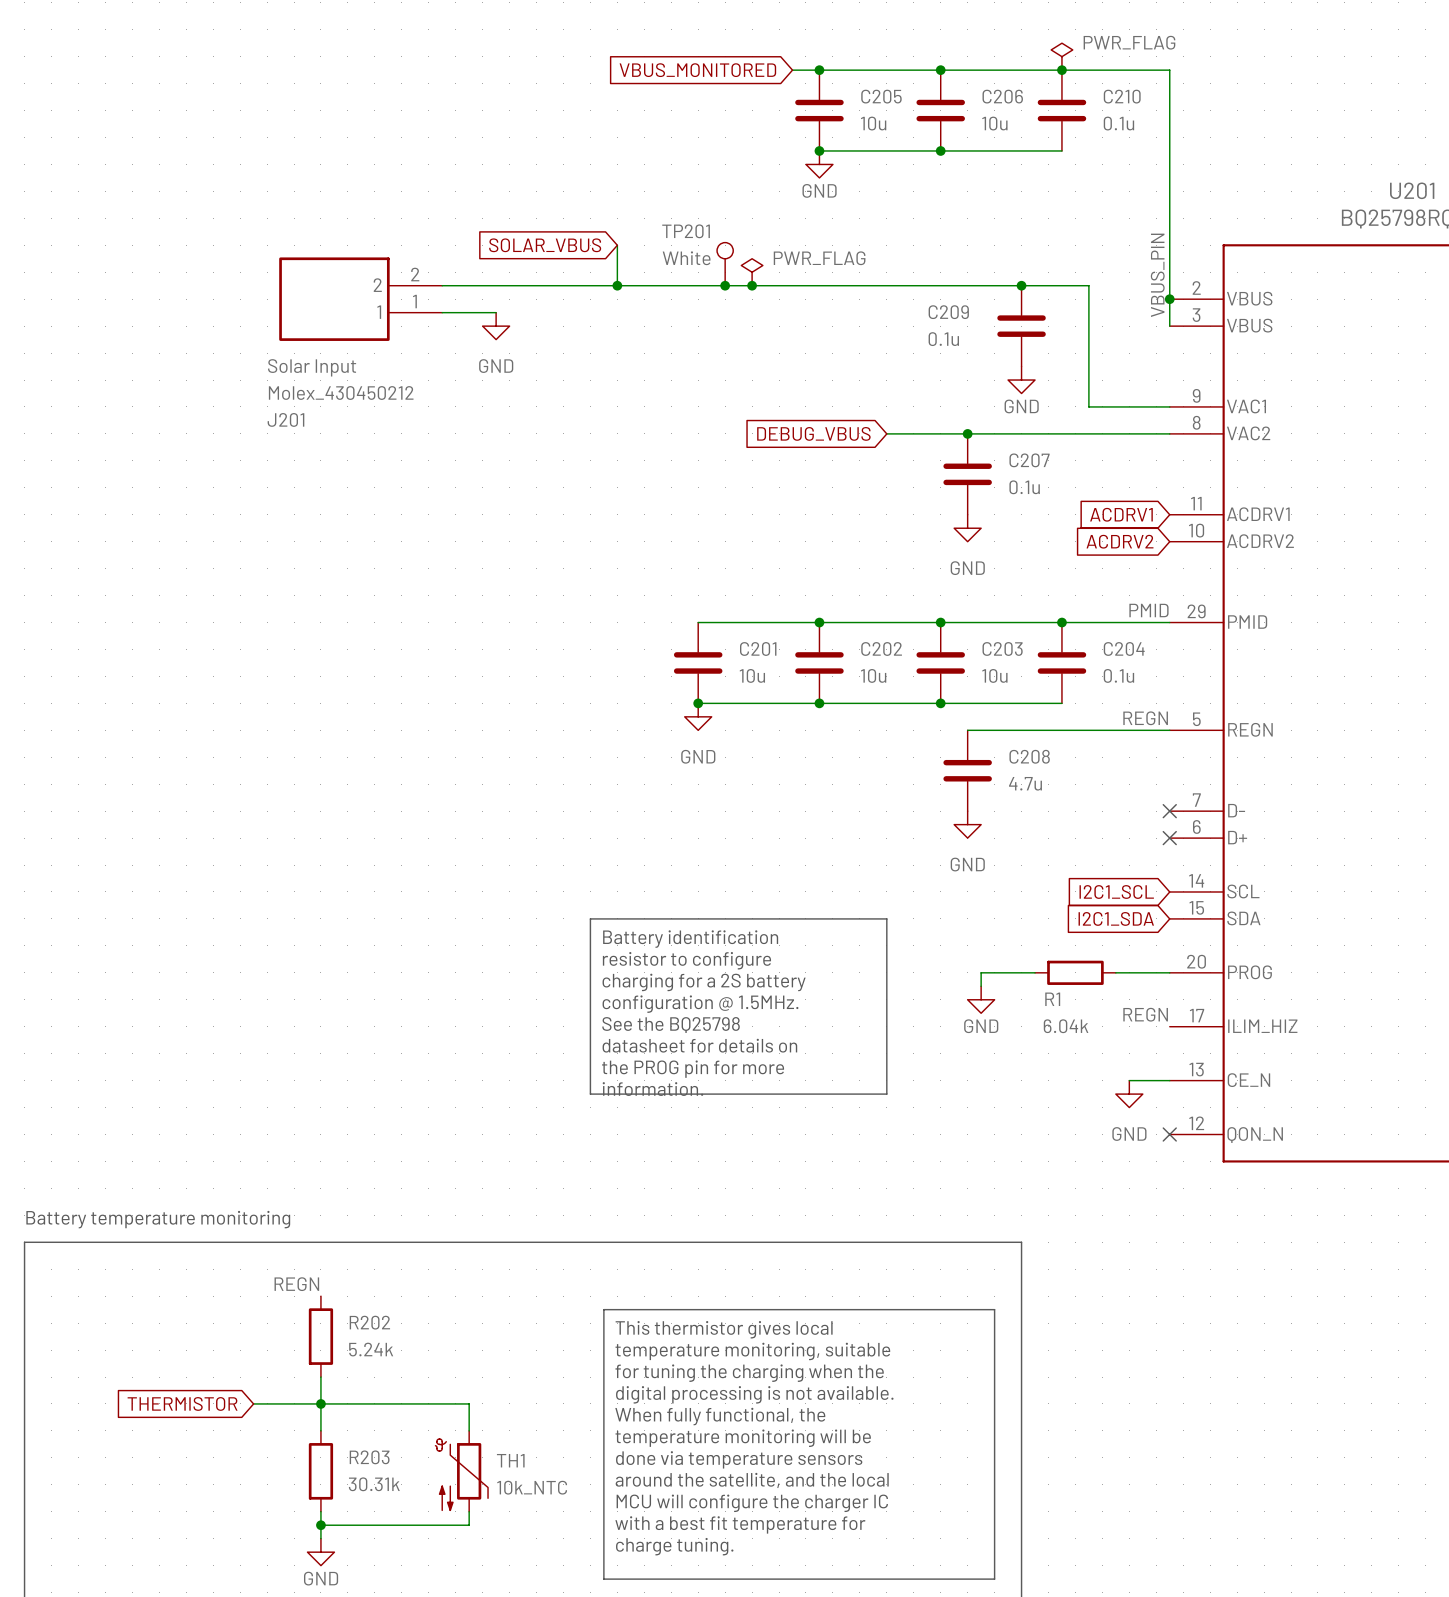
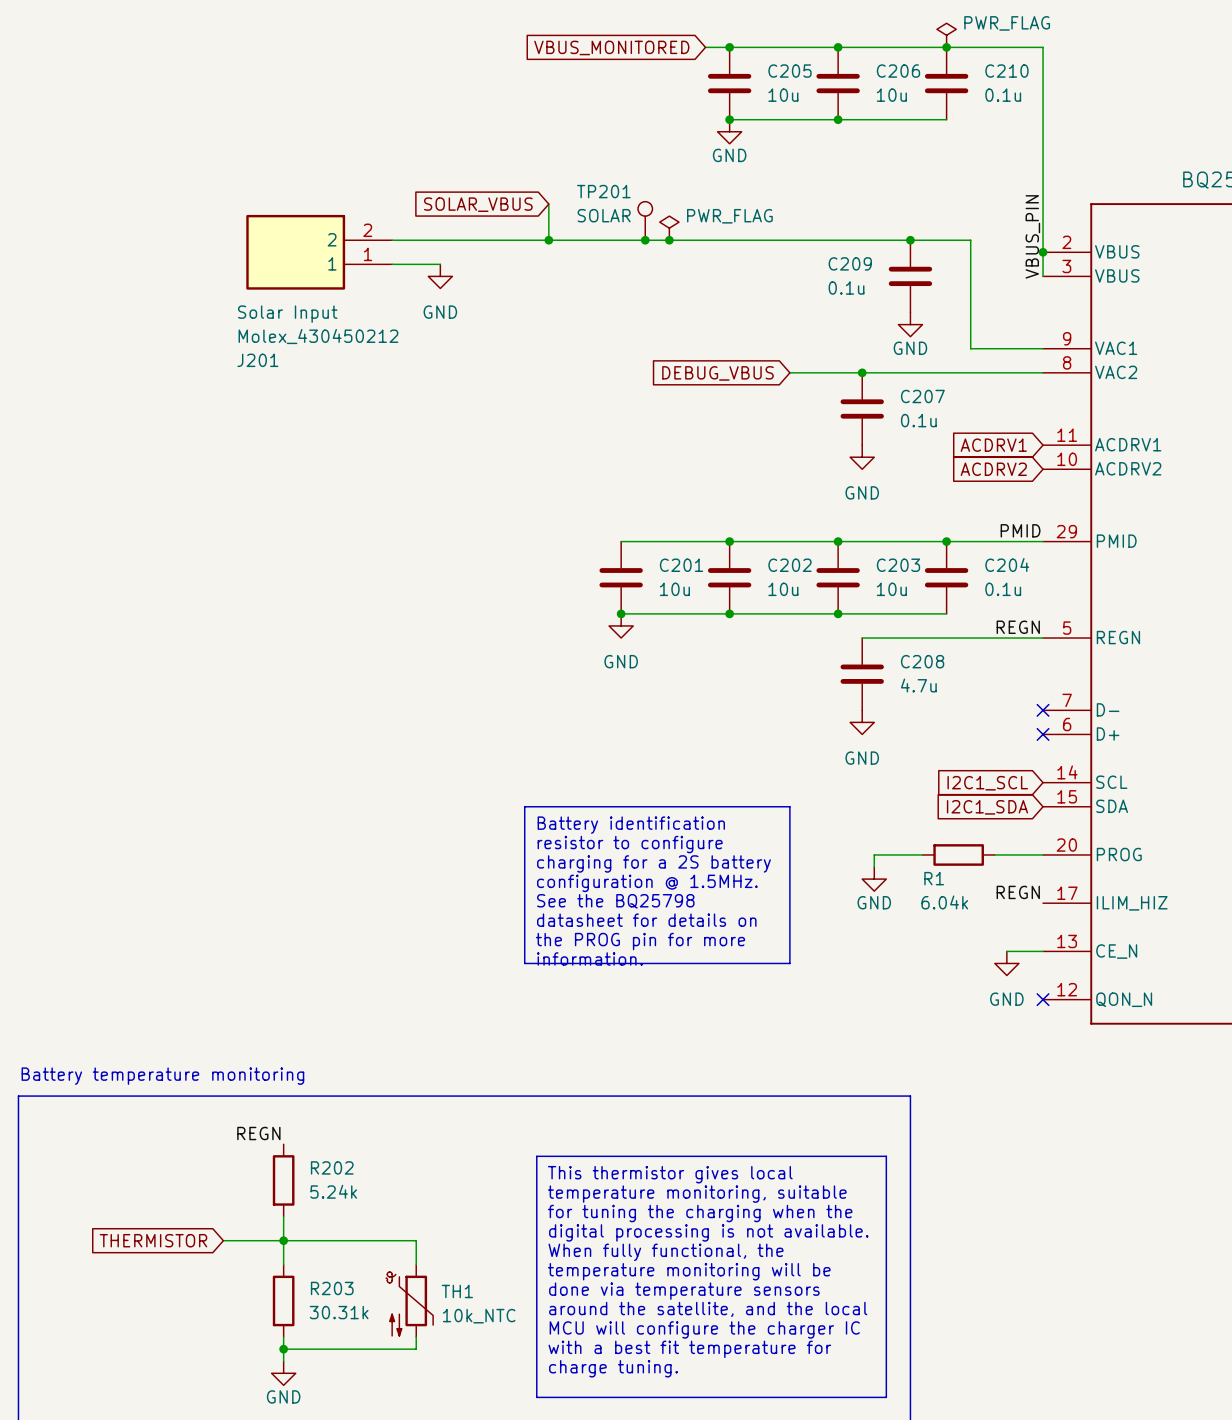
TP201 value: White (686, 258) -> SOLAR (604, 215)

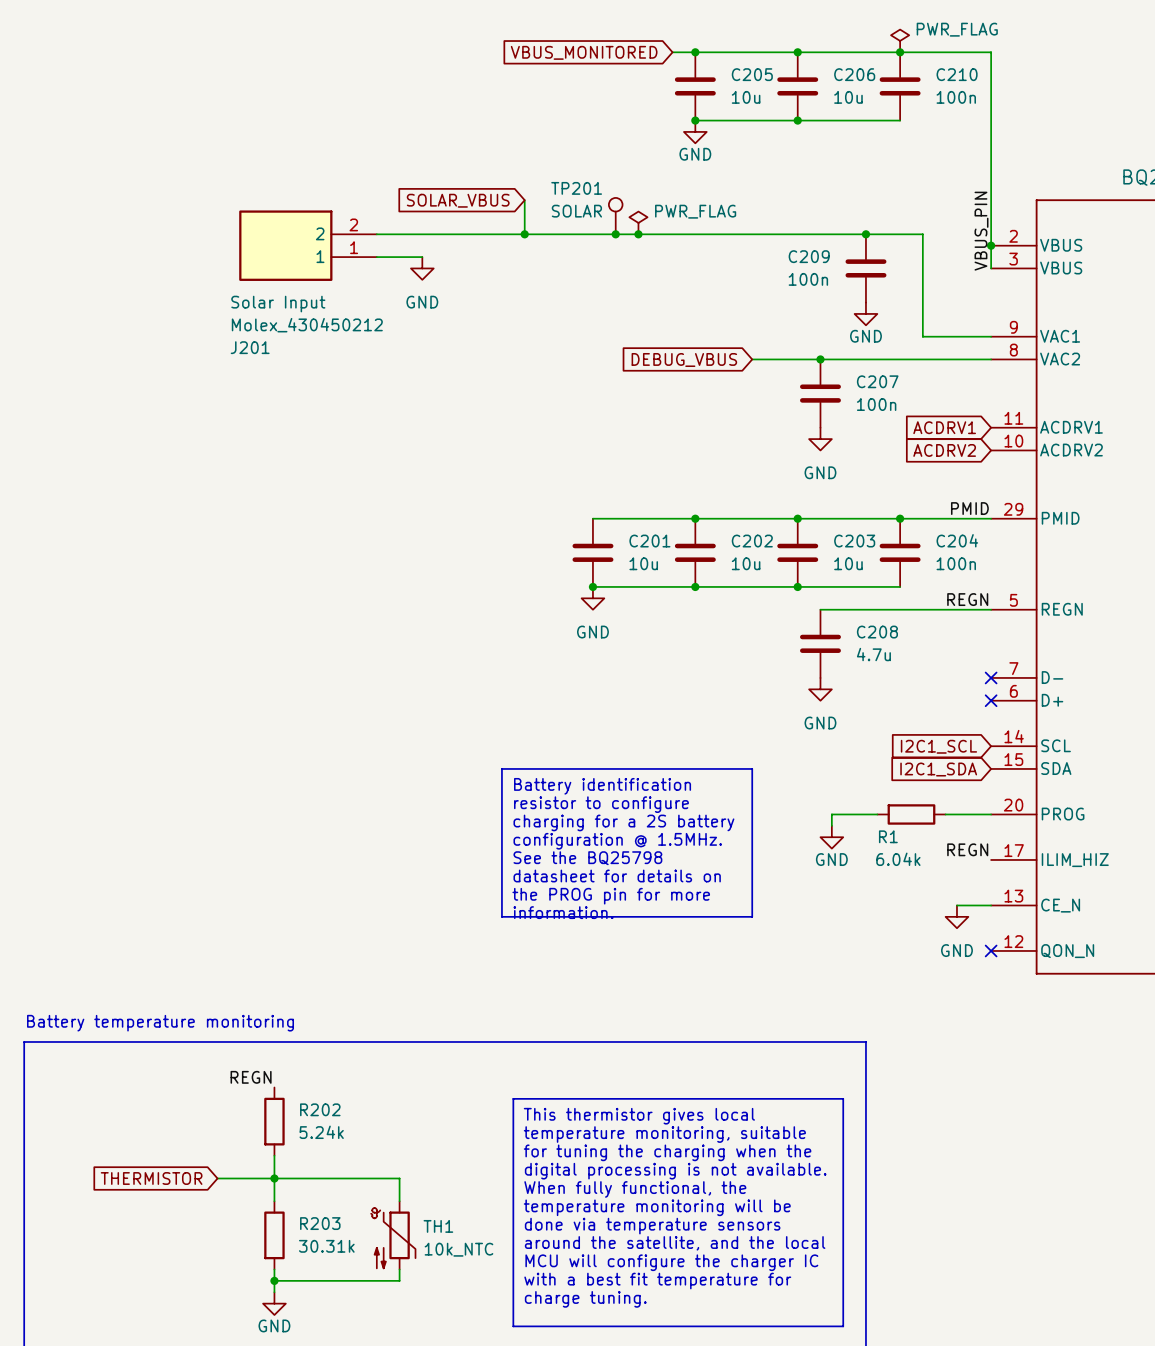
C210 value: 0.1u (1003, 95) -> 100n (956, 97)
C209 value: 0.1u (846, 288) -> 100n (808, 279)
C207 value: 0.1u (918, 420) -> 100n (876, 404)
C204 value: 0.1u (1003, 589) -> 100n (956, 563)

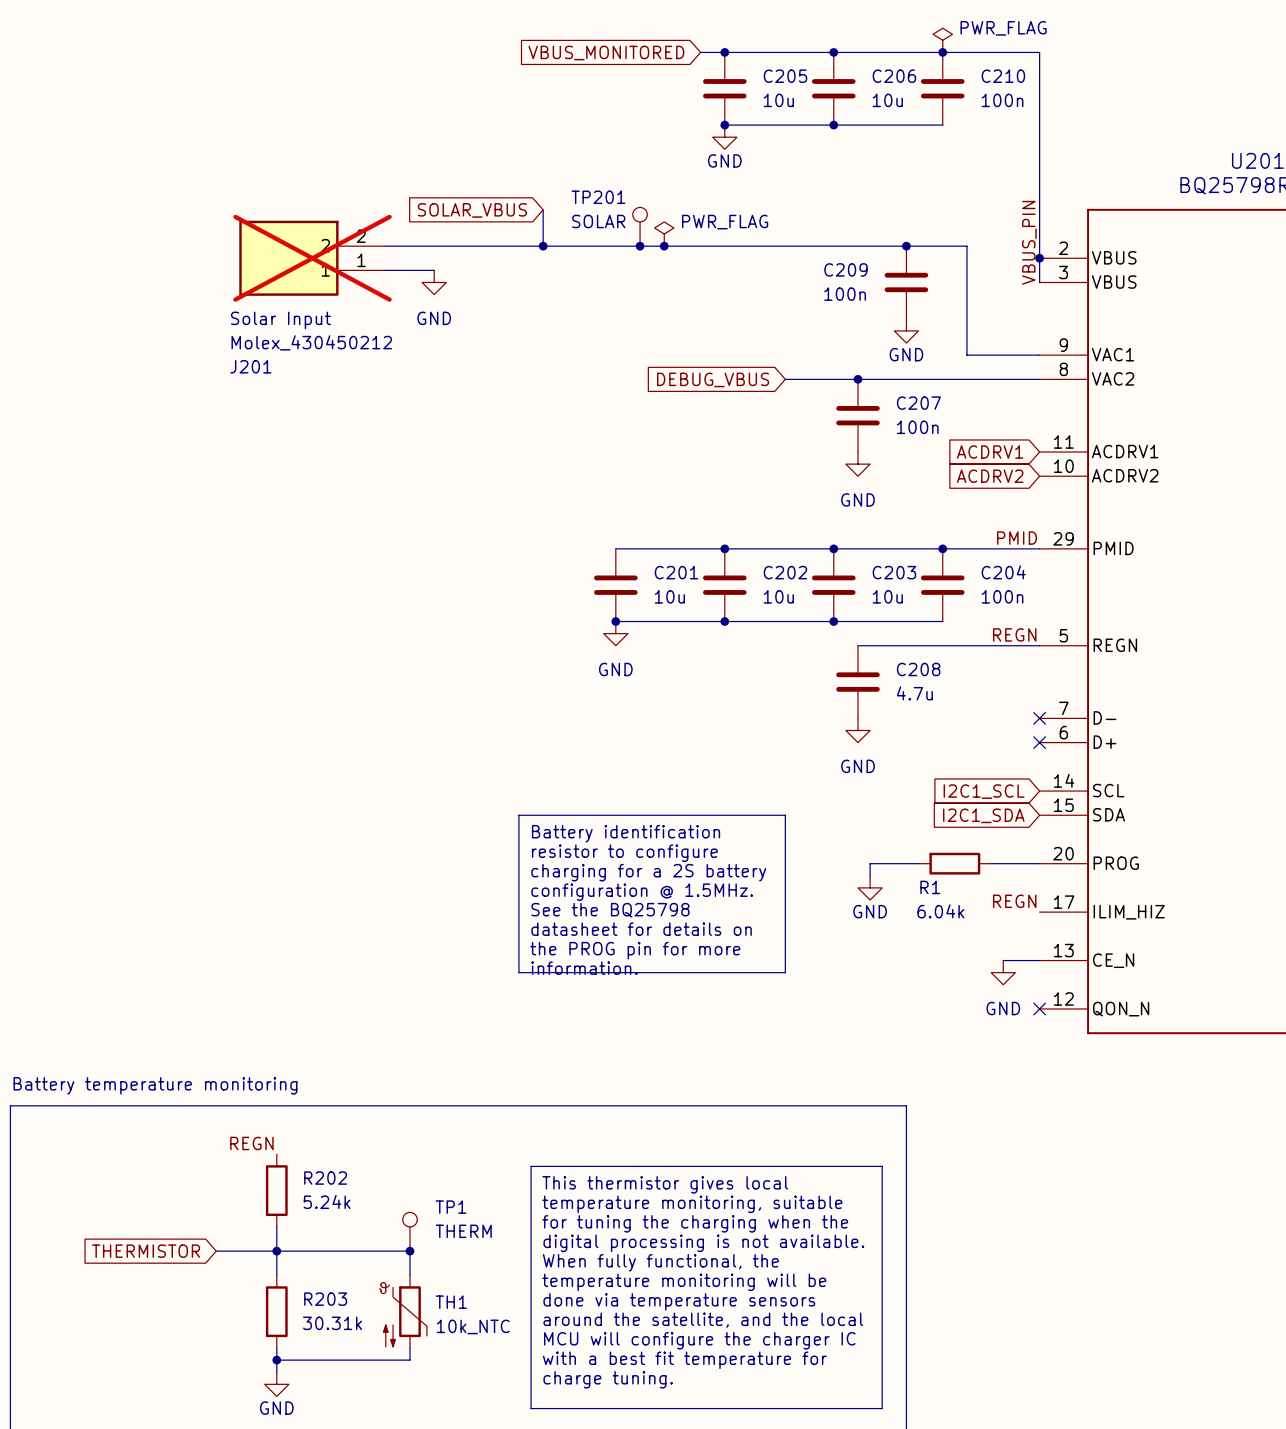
J201 do-not-place cross: none -> (312, 258)
TP1: none -> THERM (409, 1231)
junction: none -> (409, 1251)

